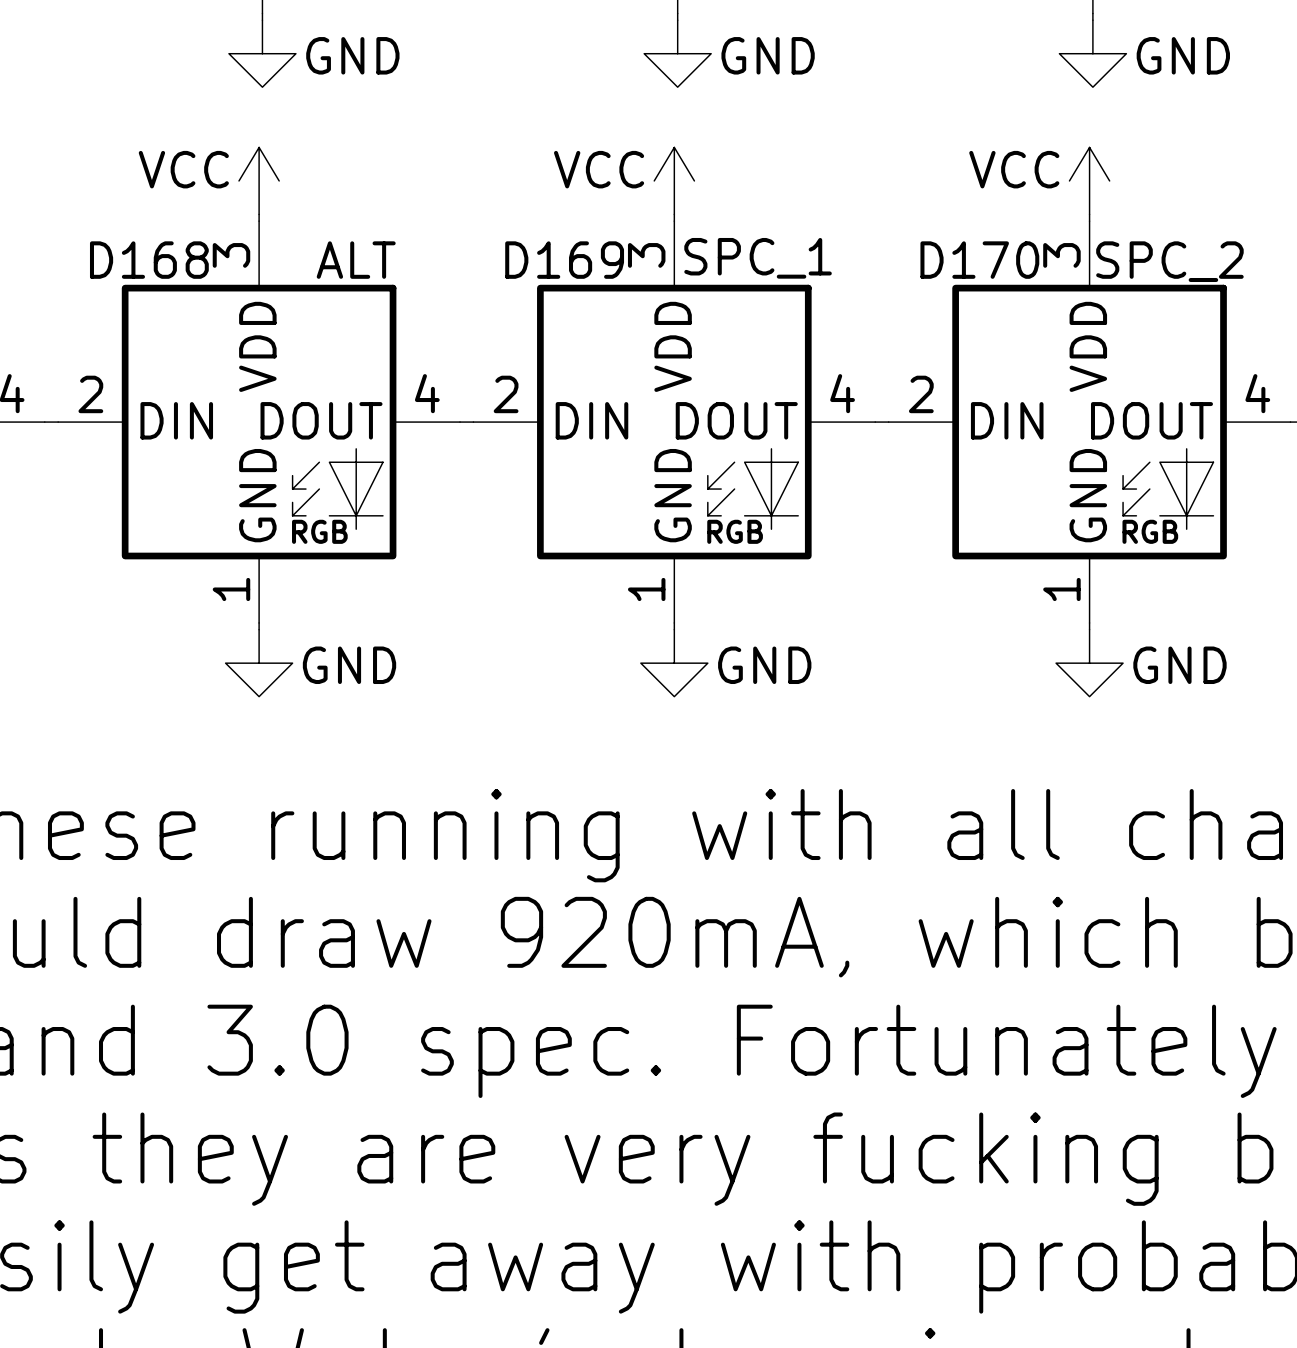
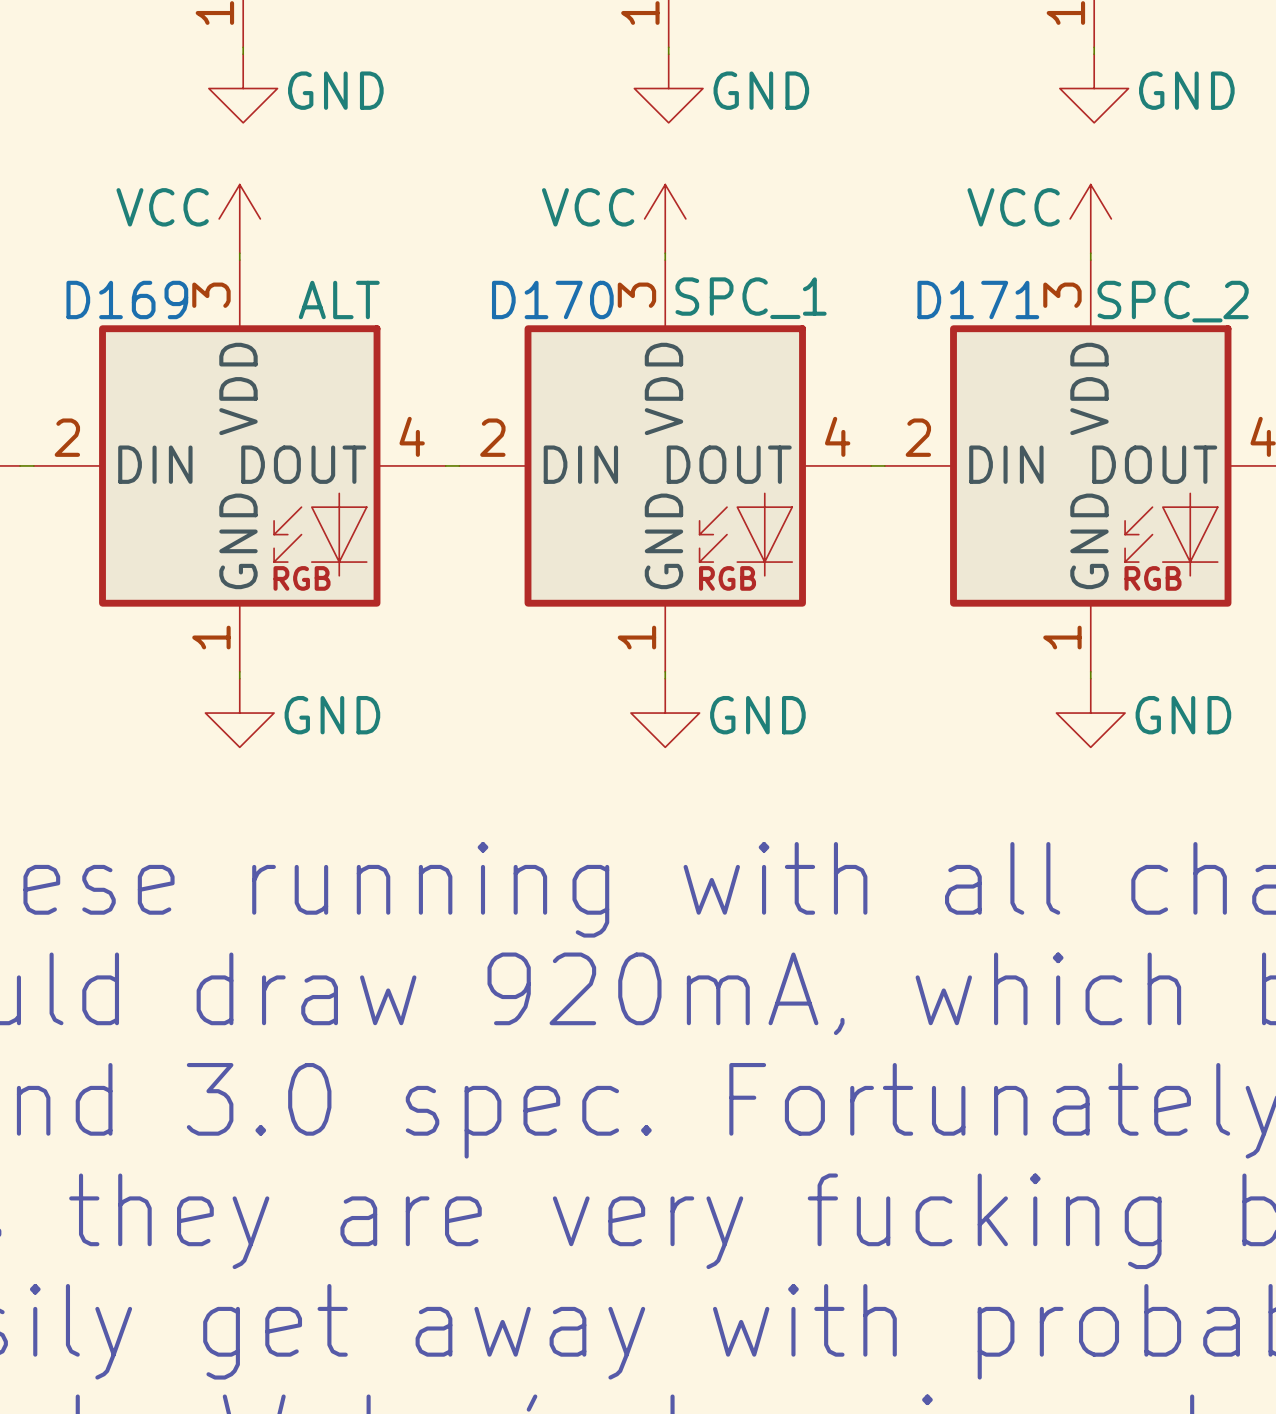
D168 name: D168 (149, 260) -> D169 (127, 299)
D169 name: D169 (564, 260) -> D170 (552, 299)
D170 name: D170 (979, 260) -> D171 (978, 299)

